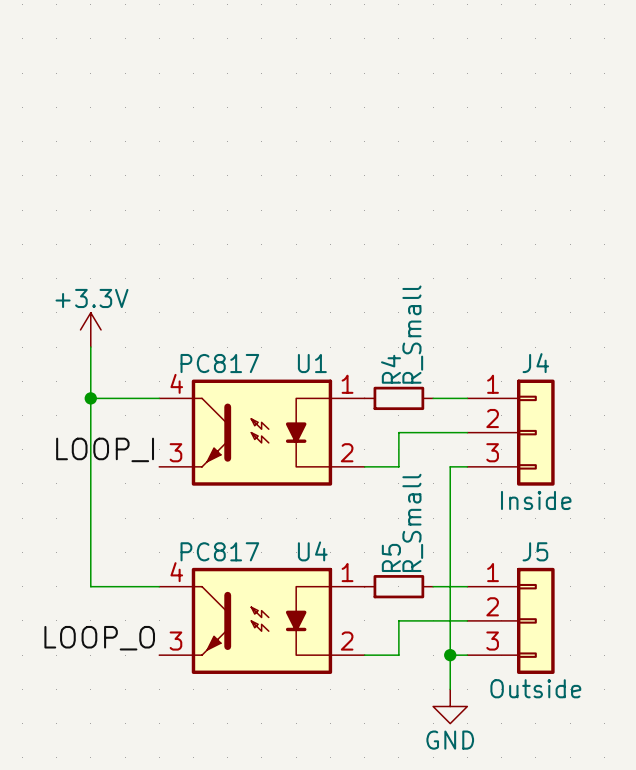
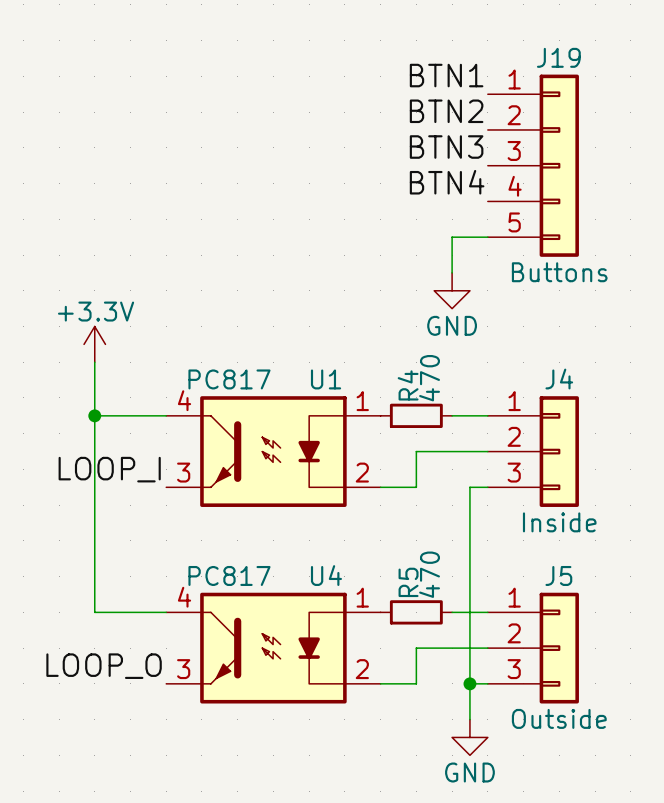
label: none -> BTN1 (446, 75)
label: none -> BTN2 (446, 111)
label: none -> BTN3 (446, 147)
J19: none -> Buttons (533, 165)
label: none -> BTN4 (447, 182)
wire: none -> (487, 237) (452, 237) (452, 272)
power symbol: none -> GND (452, 290)
R4 value: R_Small (412, 334) -> 470 (429, 378)
R5 value: R_Small (412, 522) -> 470 (429, 574)

